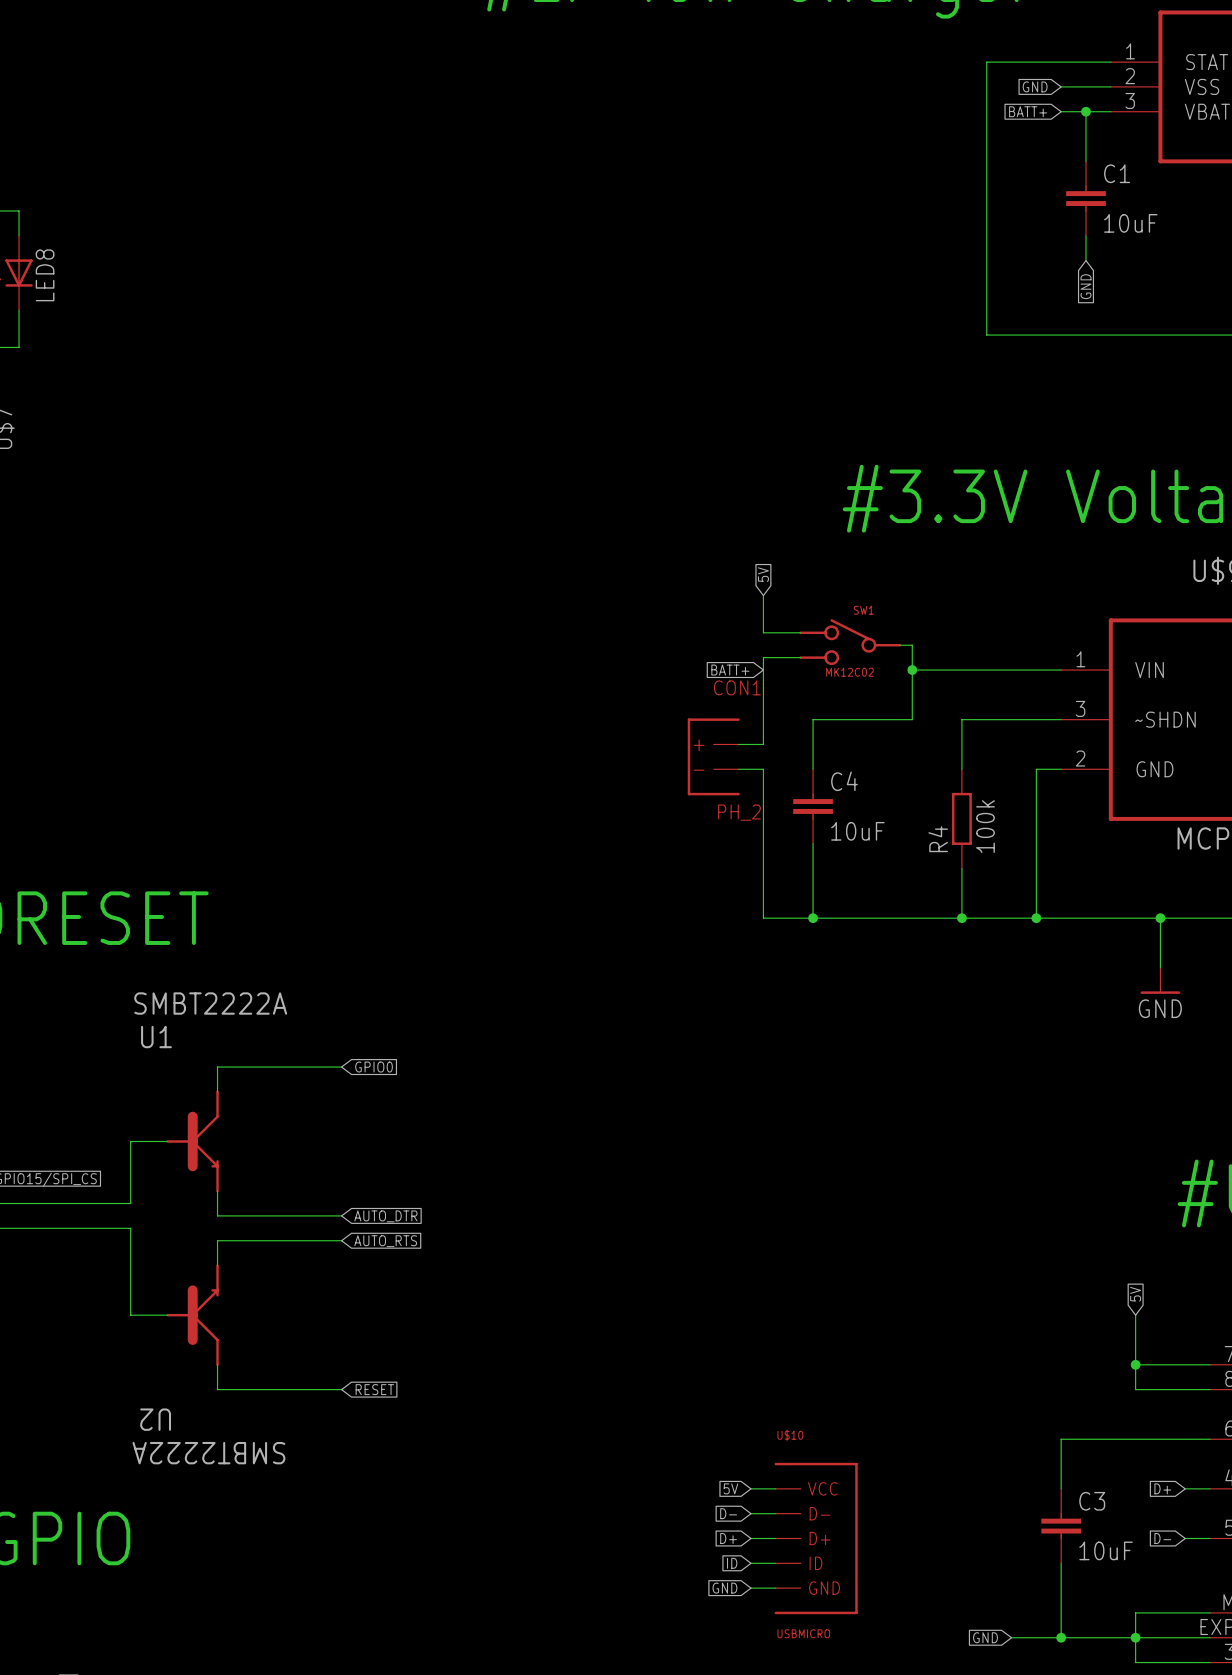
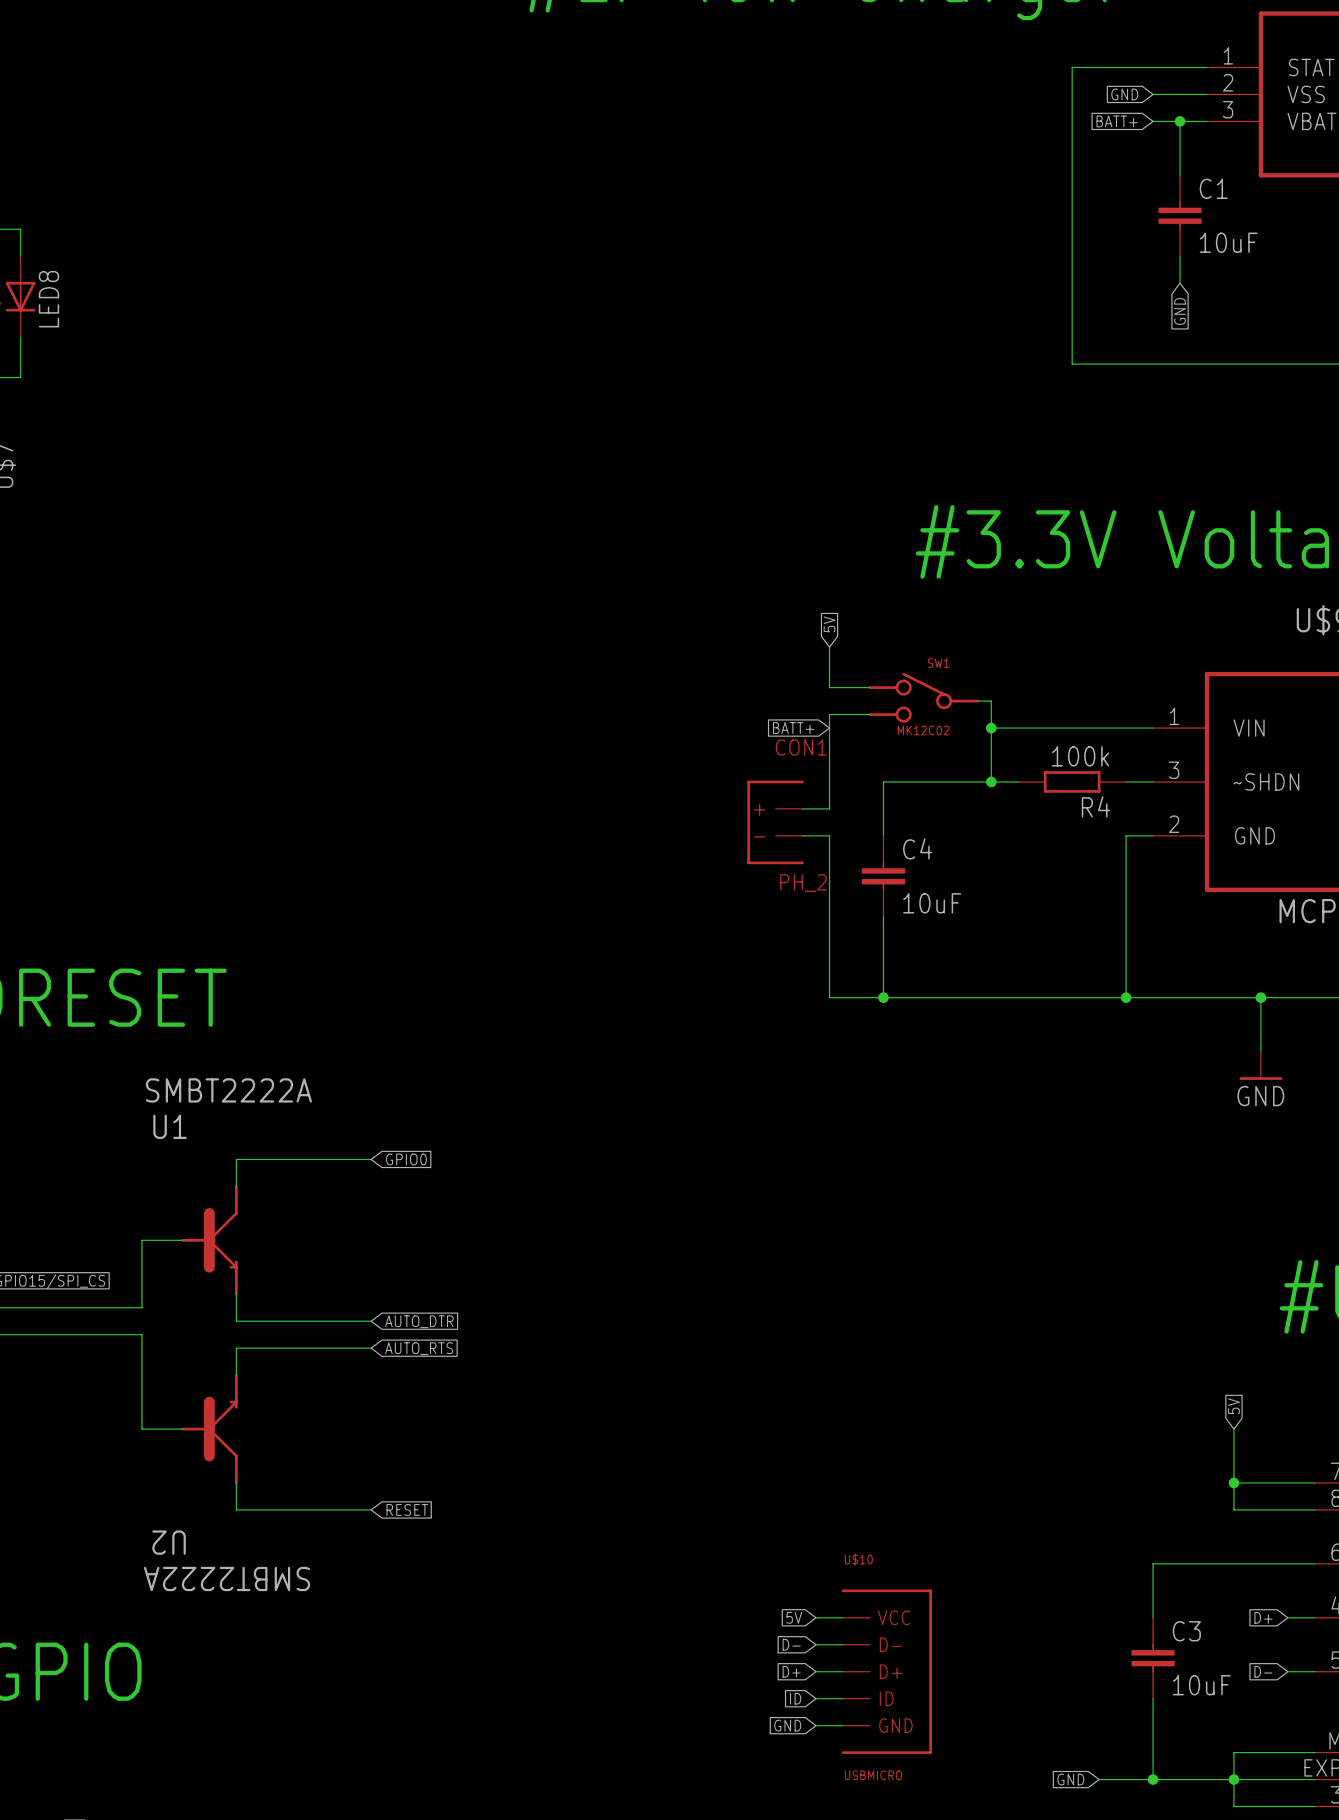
wire: none -> (991, 781) (1018, 781)
junction: none -> (991, 781)
wire: (1036, 719) (961, 719) (961, 769) -> none
R4 rotation: 0° (961, 818) -> 90° clockwise (1072, 781)
R4 position: (961, 818) -> (1072, 781)
R4 value position: 100k (985, 826) -> 100k (1080, 756)
R4 name position: R4 (938, 839) -> R4 (1095, 806)
wire: (961, 868) (961, 918) -> none
junction: (961, 918) -> none

